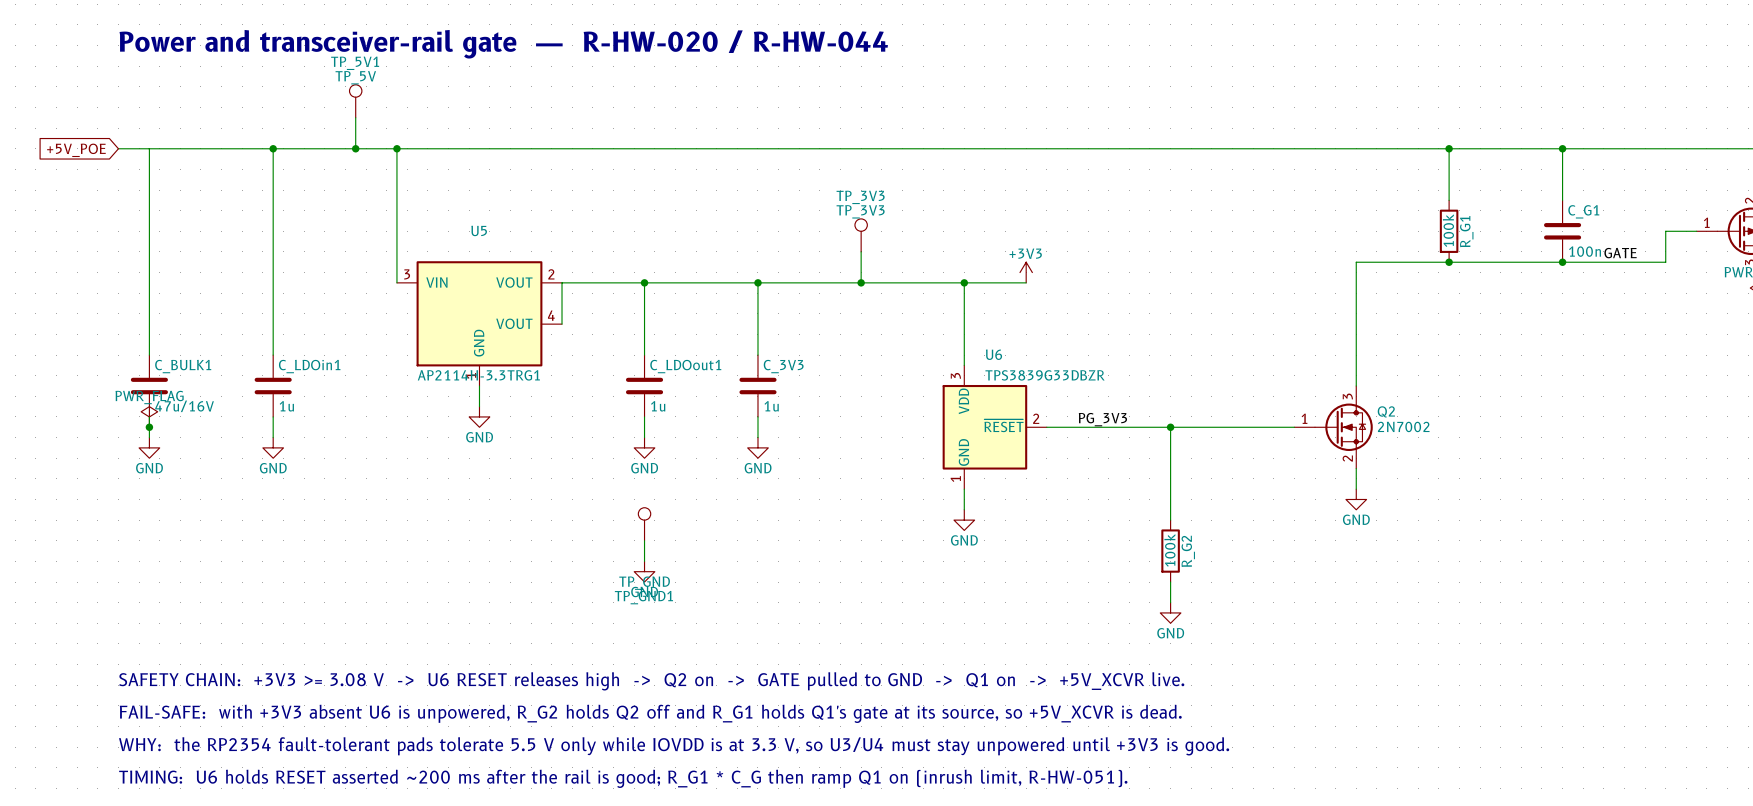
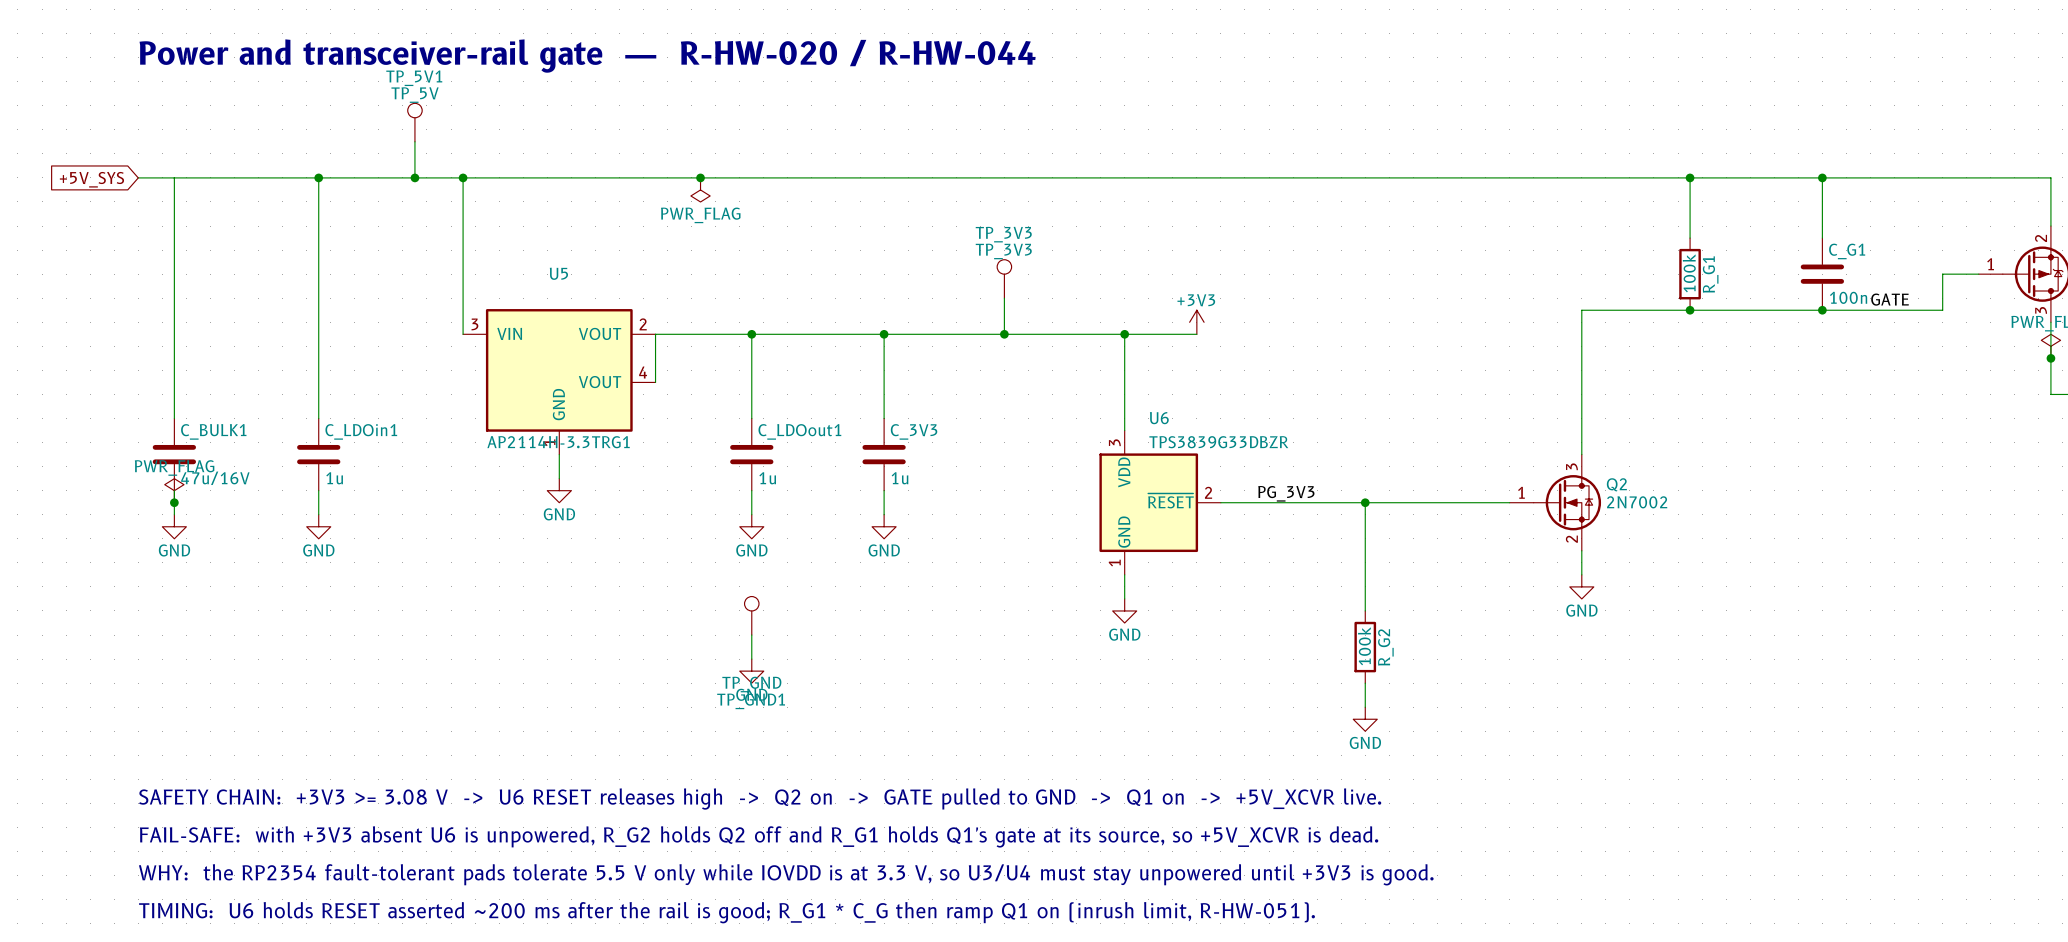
junction: none -> (700, 177)
global label: +5V_POE (76, 150) -> +5V_SYS (91, 179)
power symbol: none -> PWR_FLAG (700, 189)

